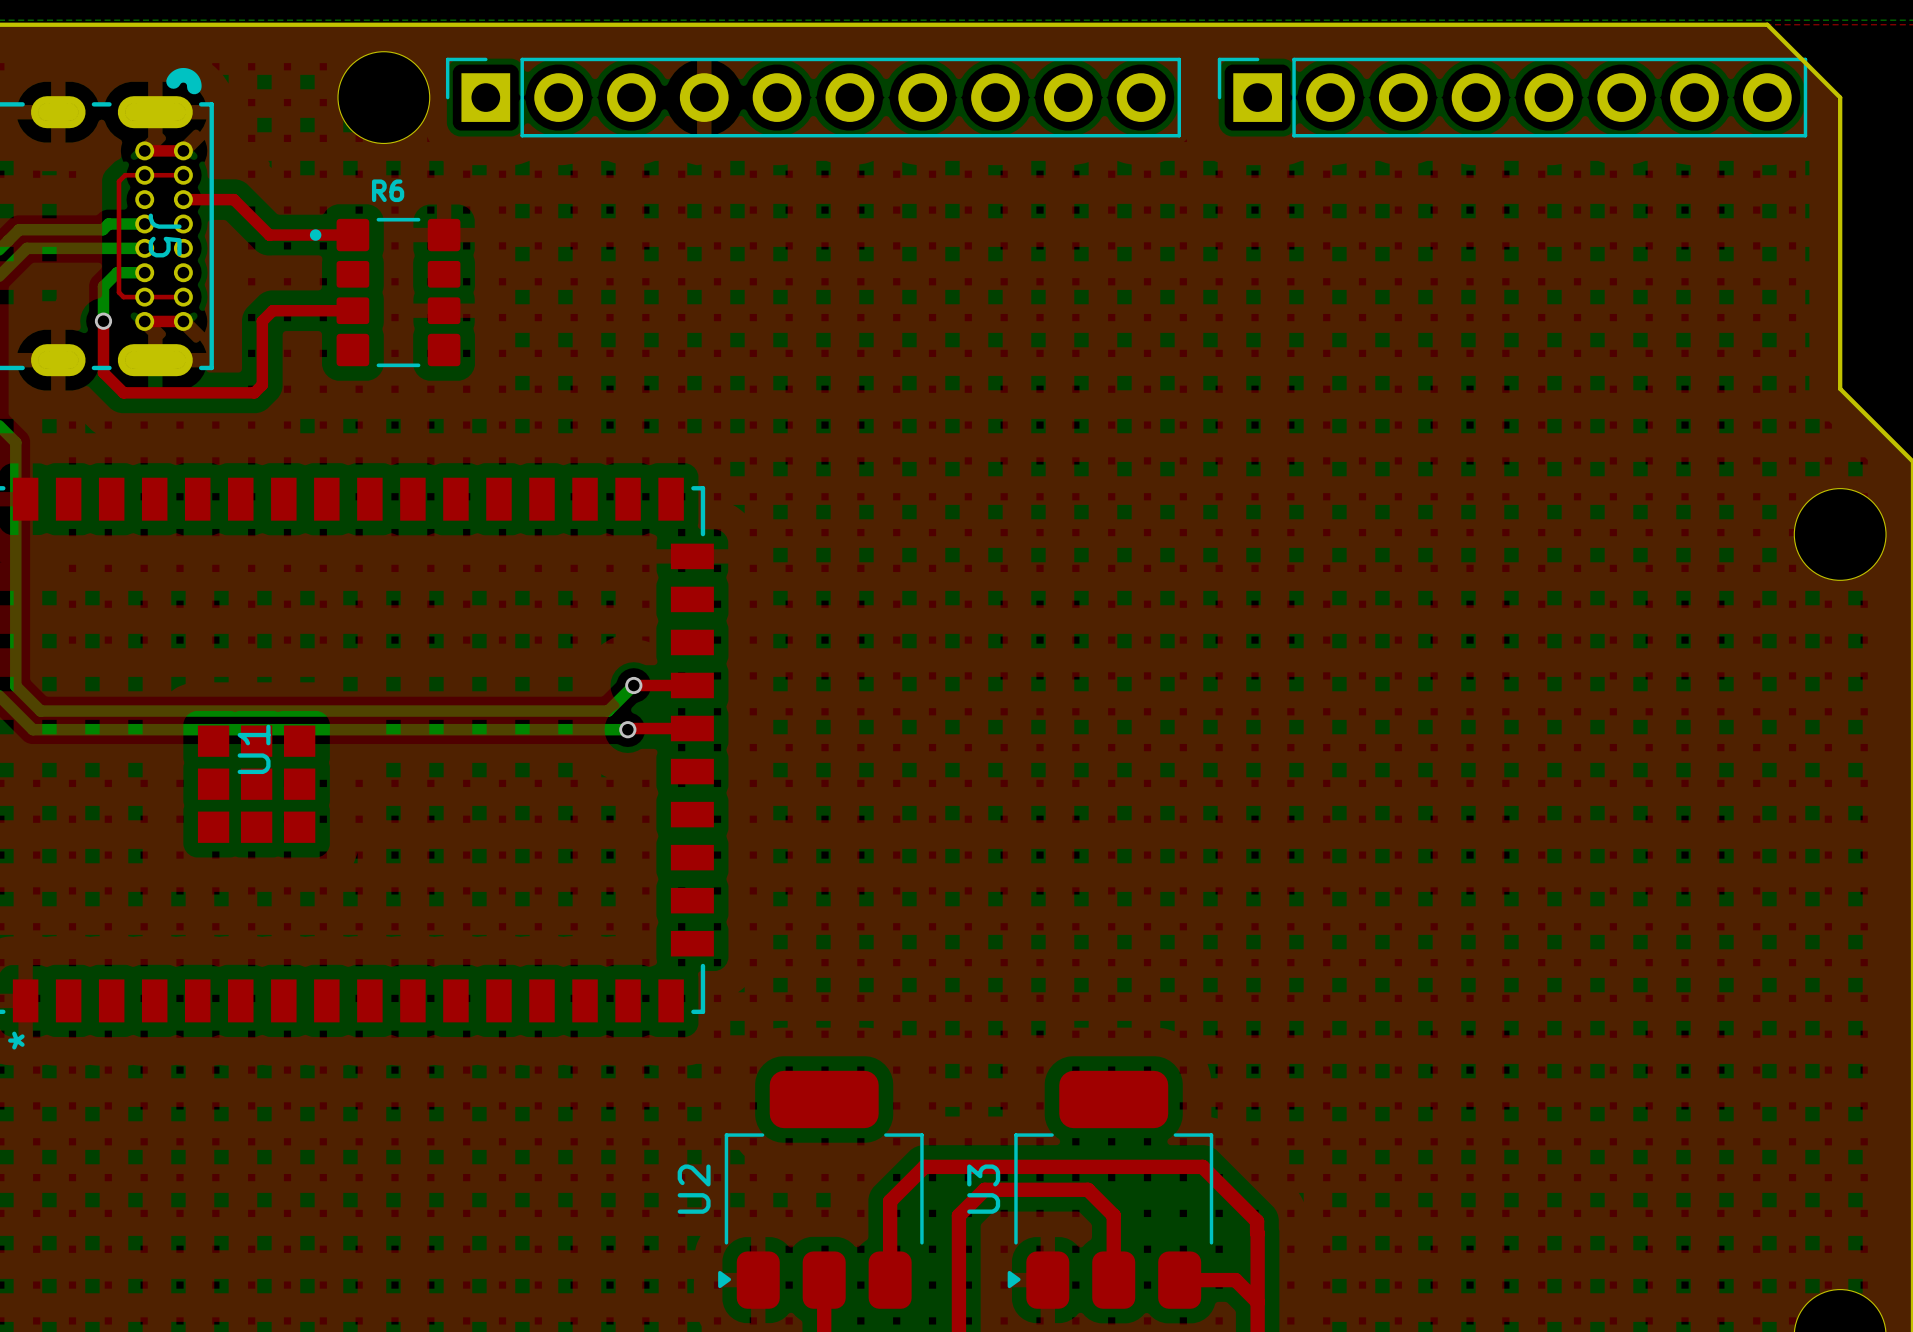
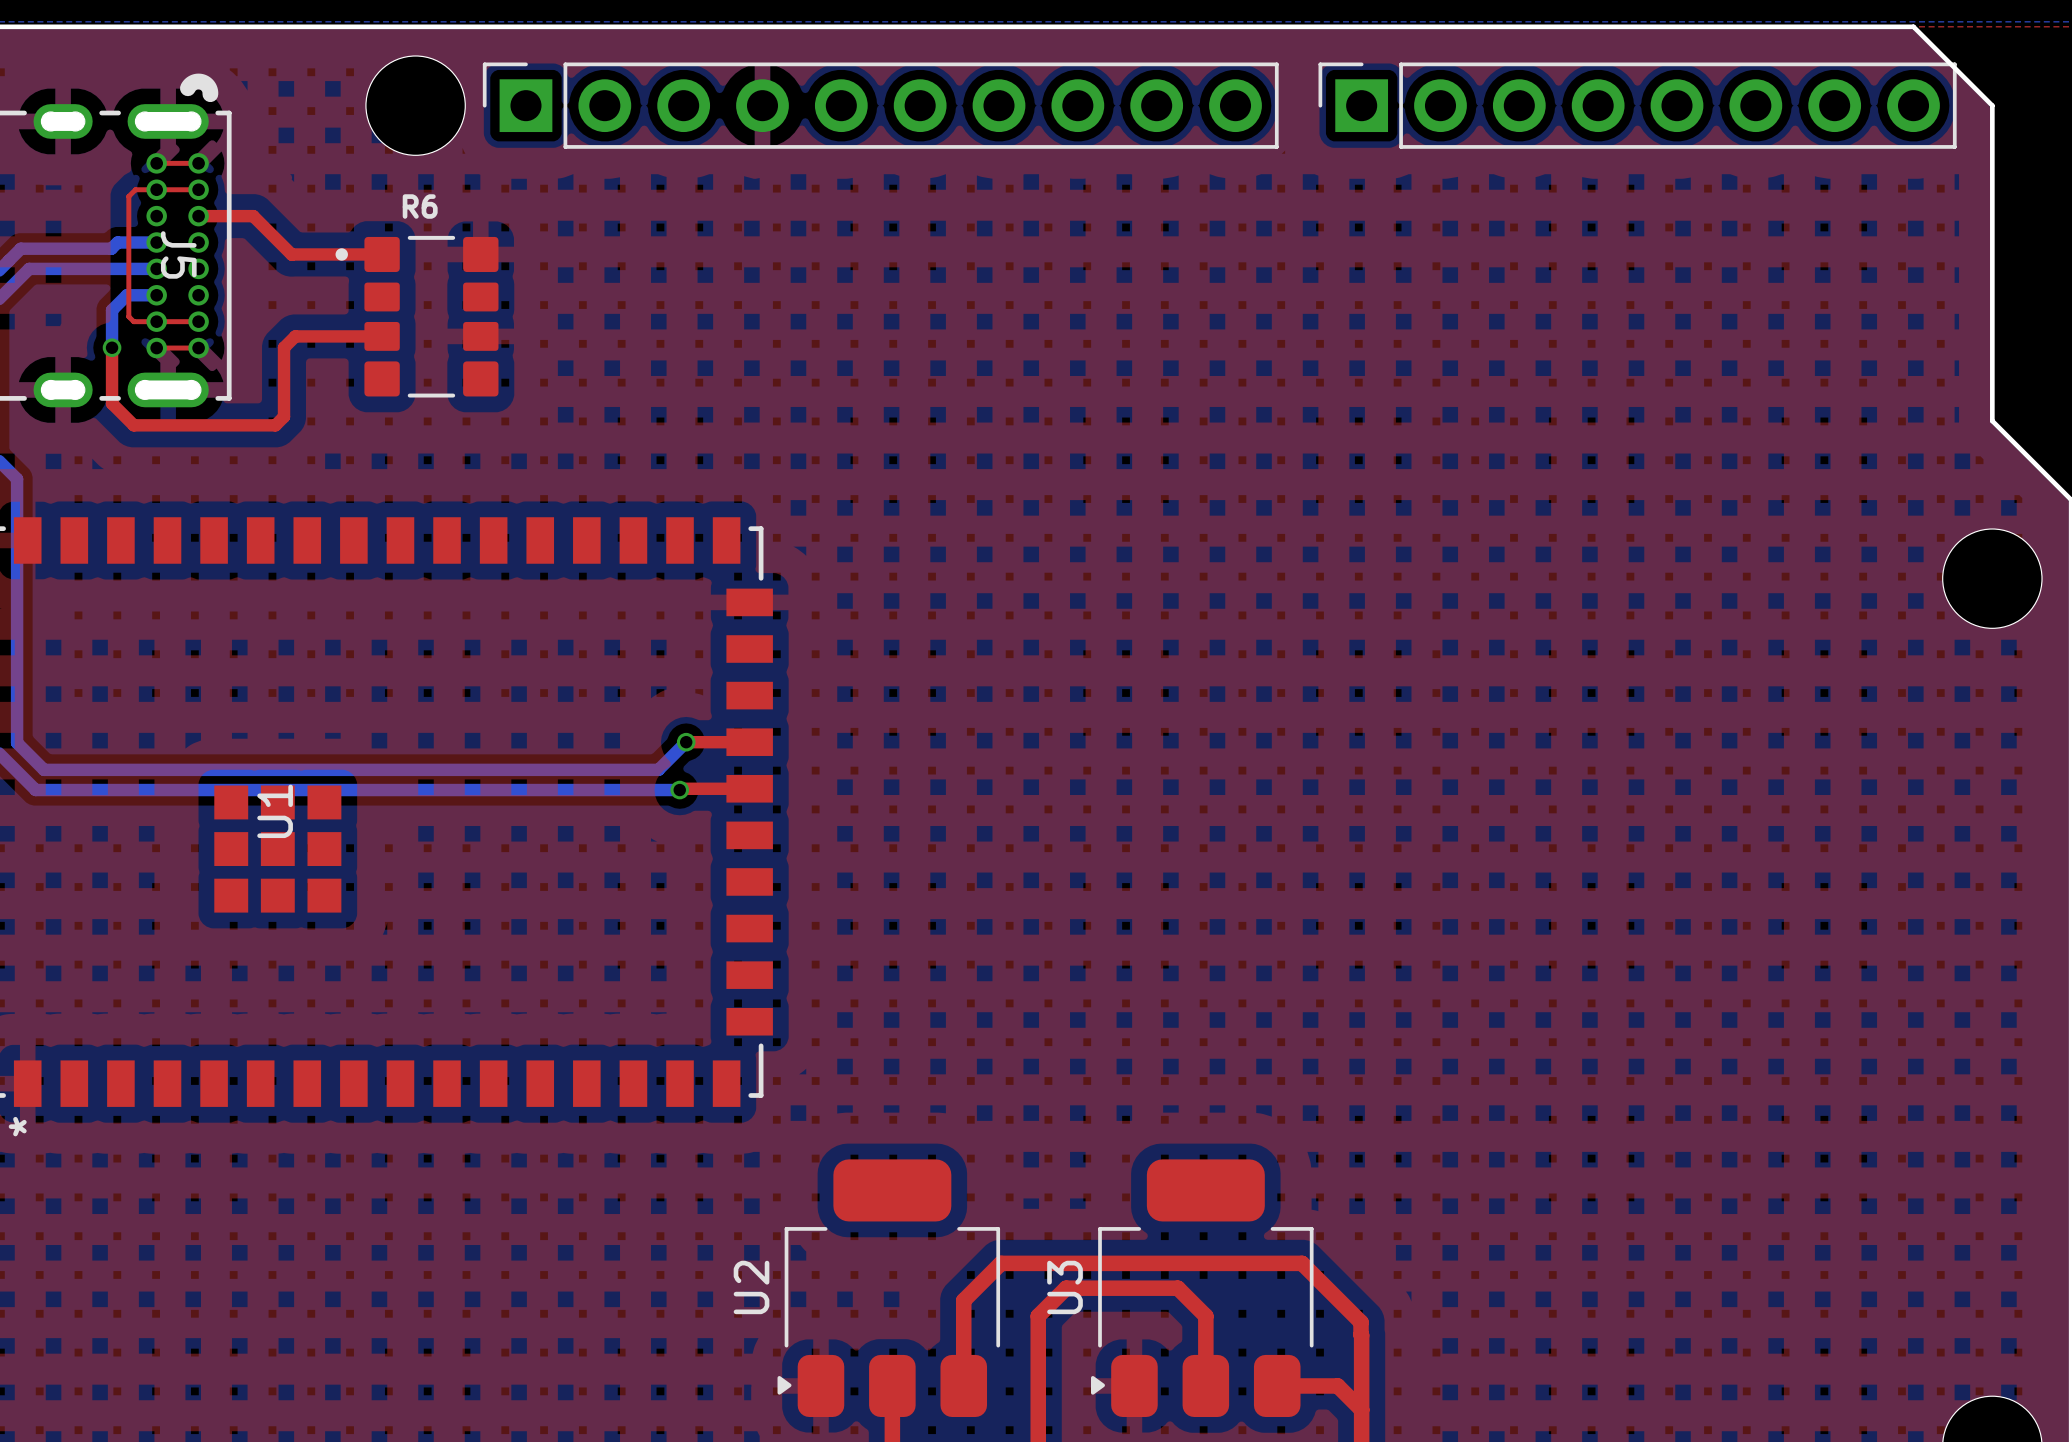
top track width: thick (144, 150) (183, 150) -> thin (156, 163) (198, 163)
top track width: thick (144, 321) (183, 321) -> thin (156, 348) (198, 348)

